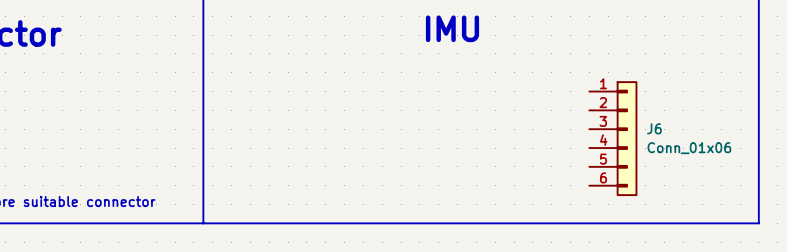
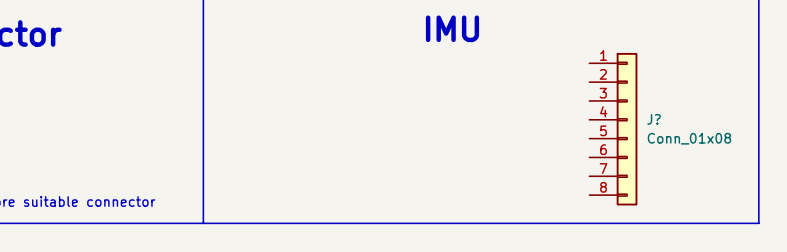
J?: none -> Conn_01x08 (613, 129)
J6: Conn_01x06 (613, 138) -> none

